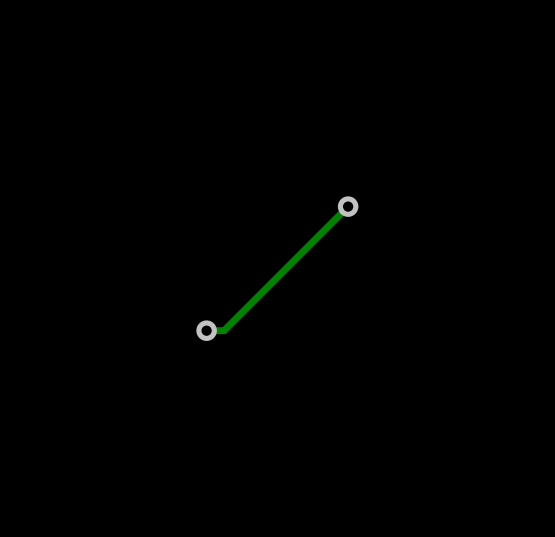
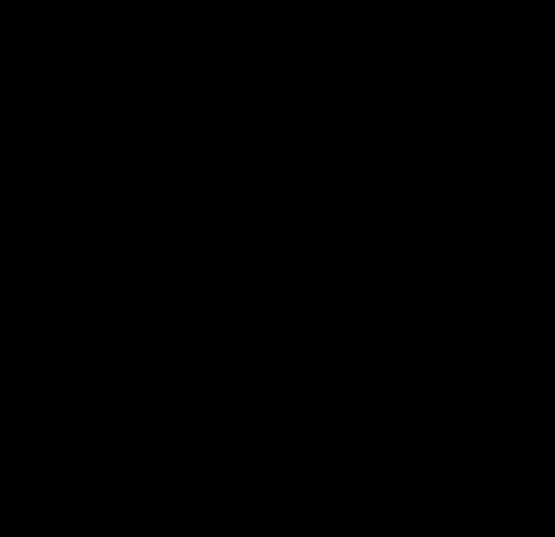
track: (348, 206) (224, 330) (206, 330) -> none
via: (348, 206) -> none
via: (206, 330) -> none

